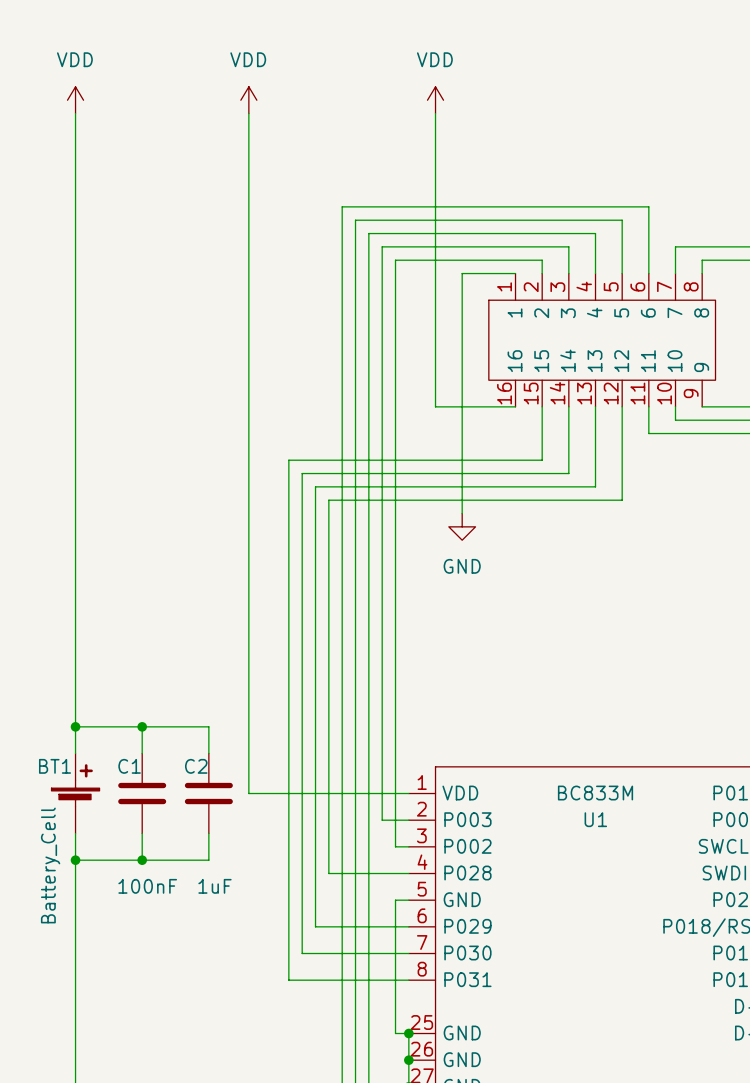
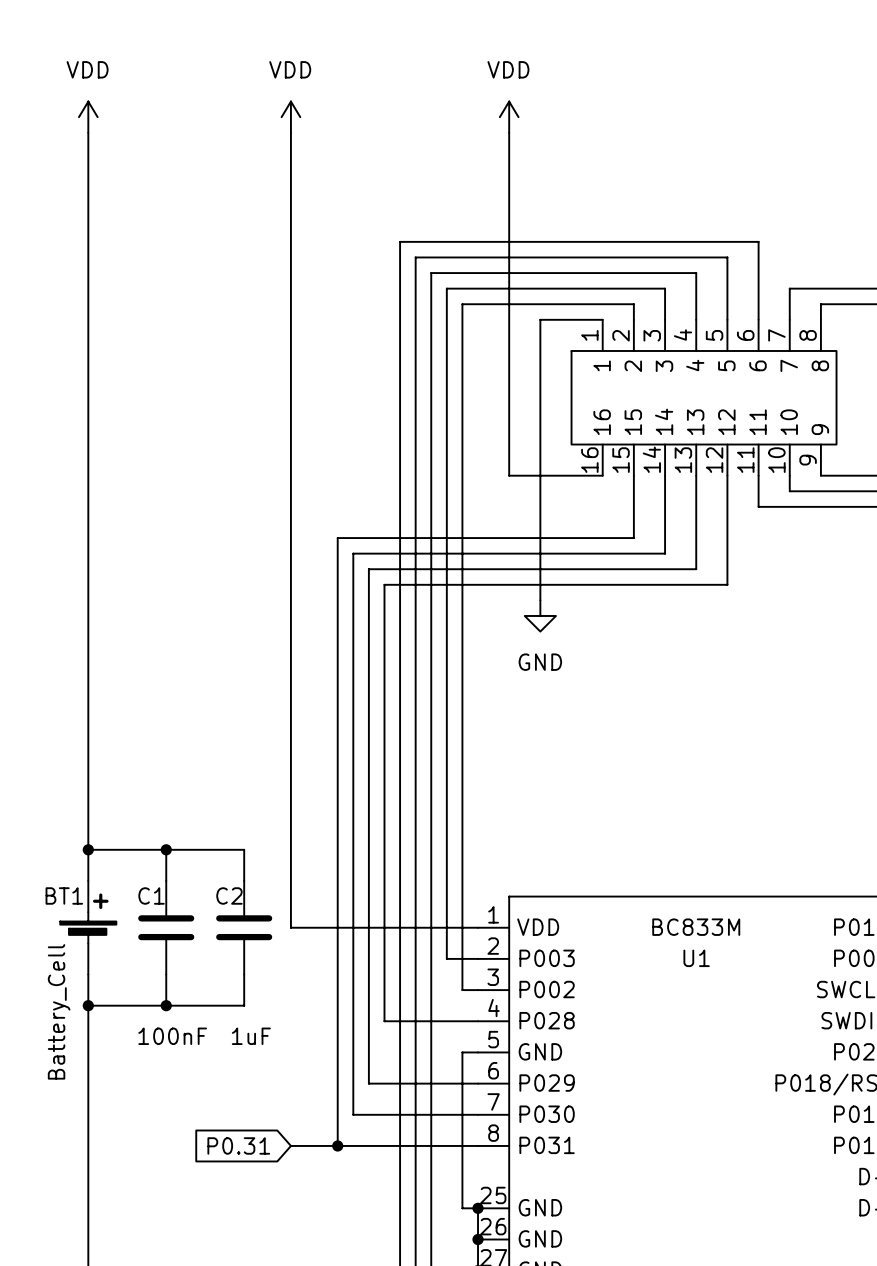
global label: none -> P0.31 (238, 1145)
wire: none -> (290, 1145) (337, 1145)
junction: none -> (337, 1145)

